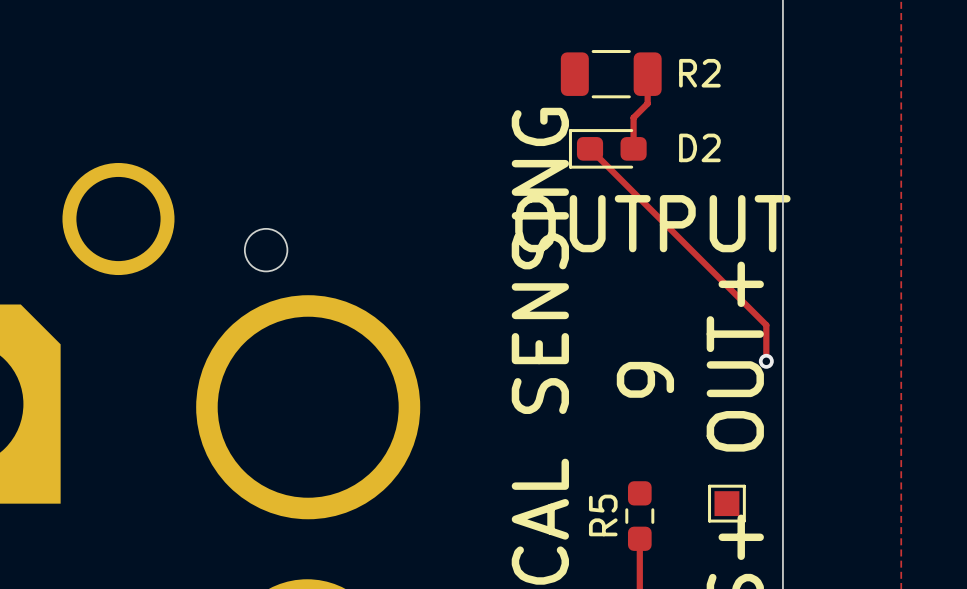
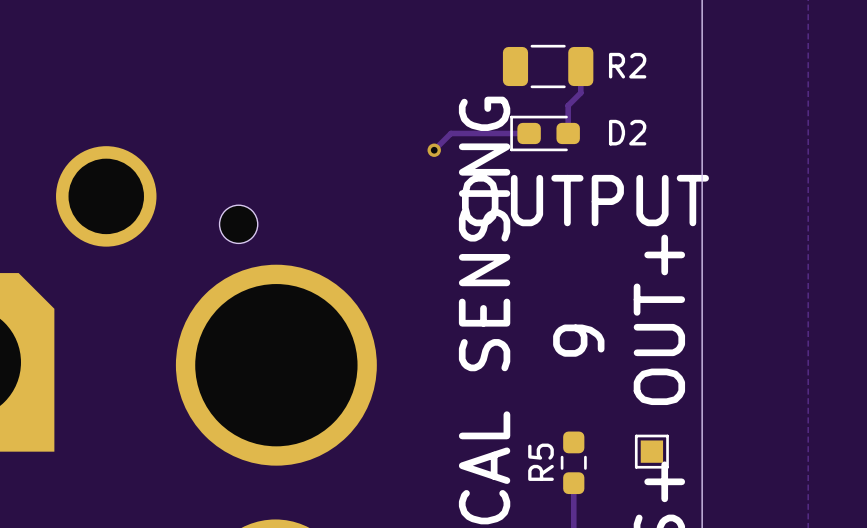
track: (590, 148) (766, 325) (766, 361) -> (529, 133) (450, 133) (434, 150)
via: none -> (434, 150)
via: (766, 361) -> none

